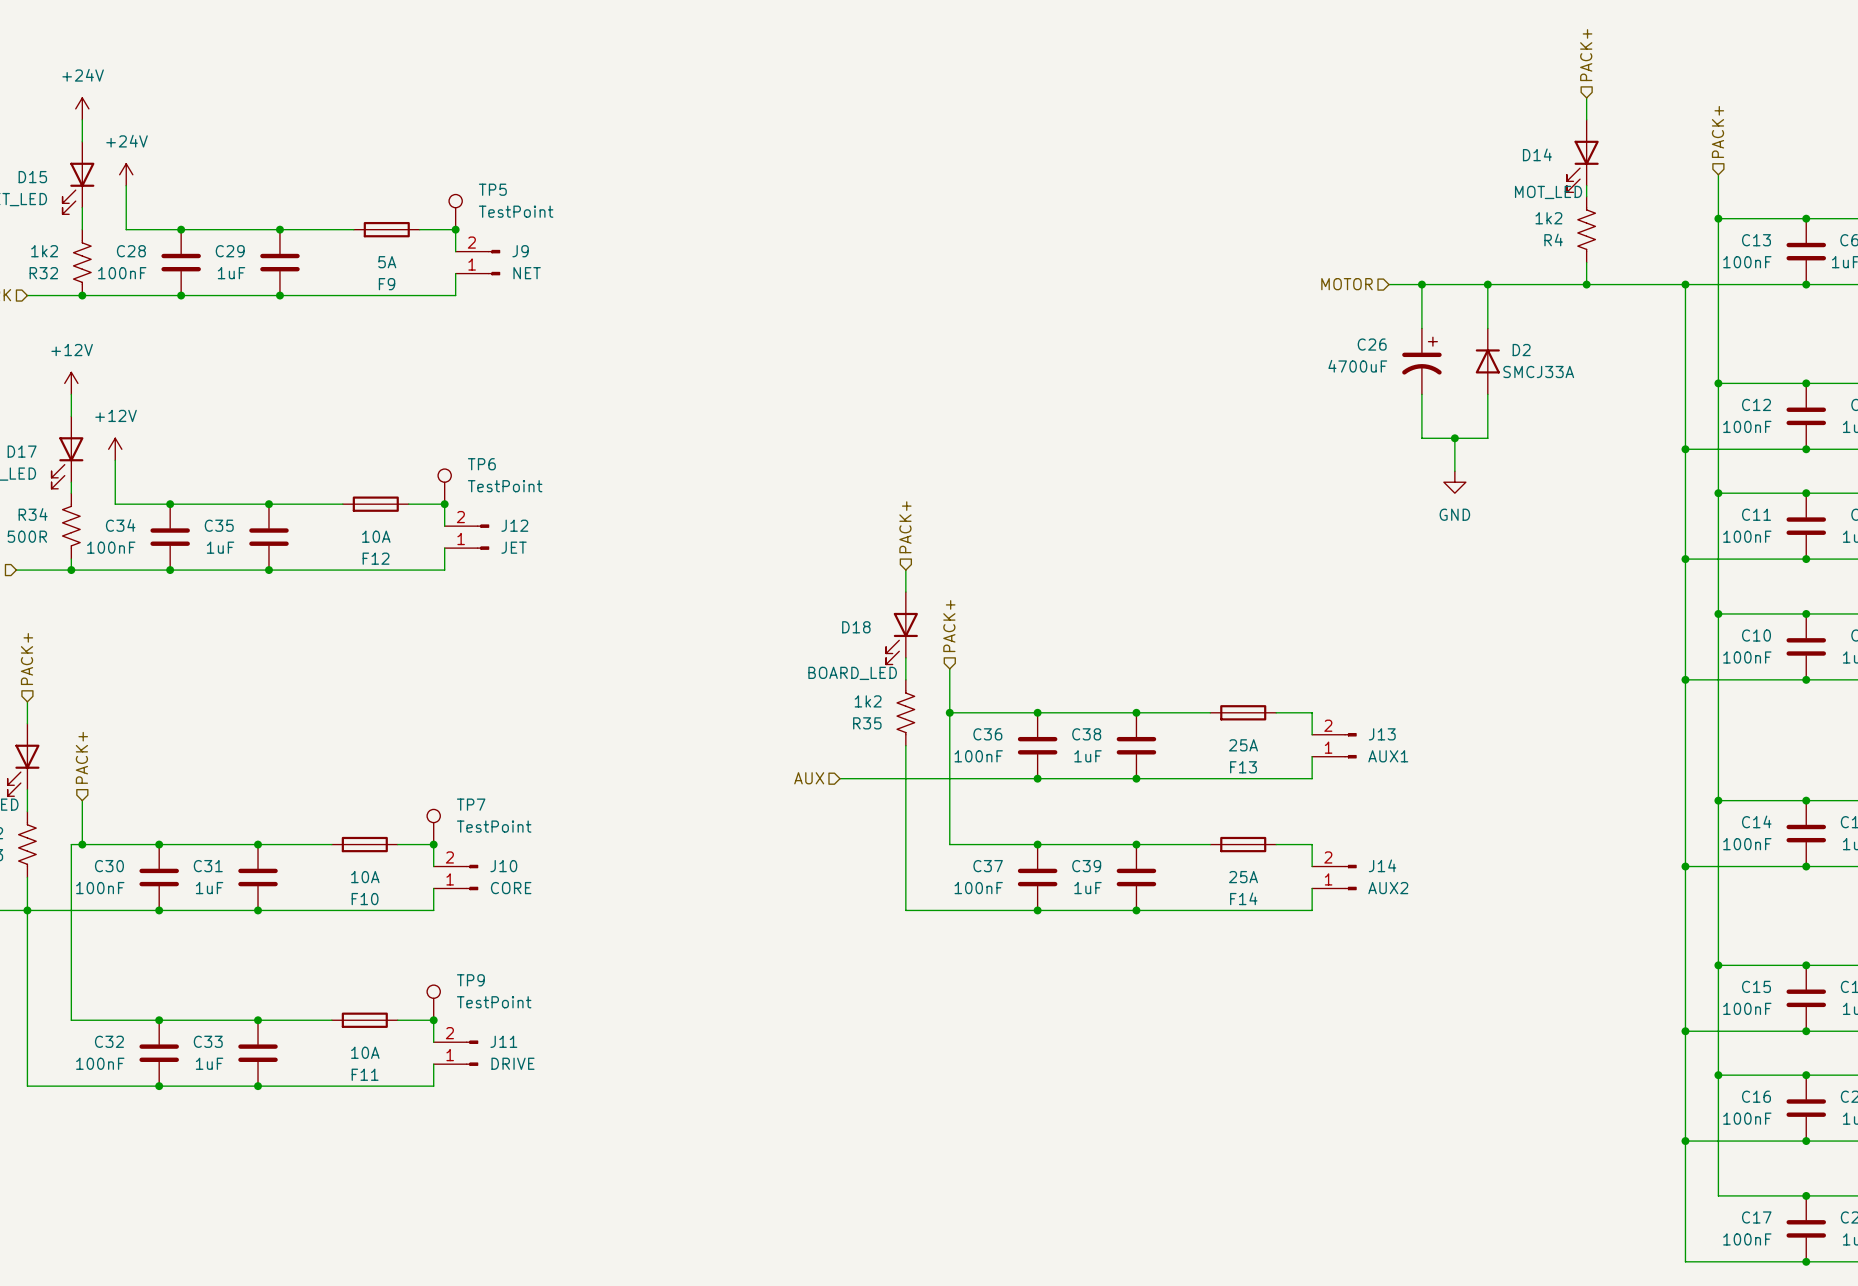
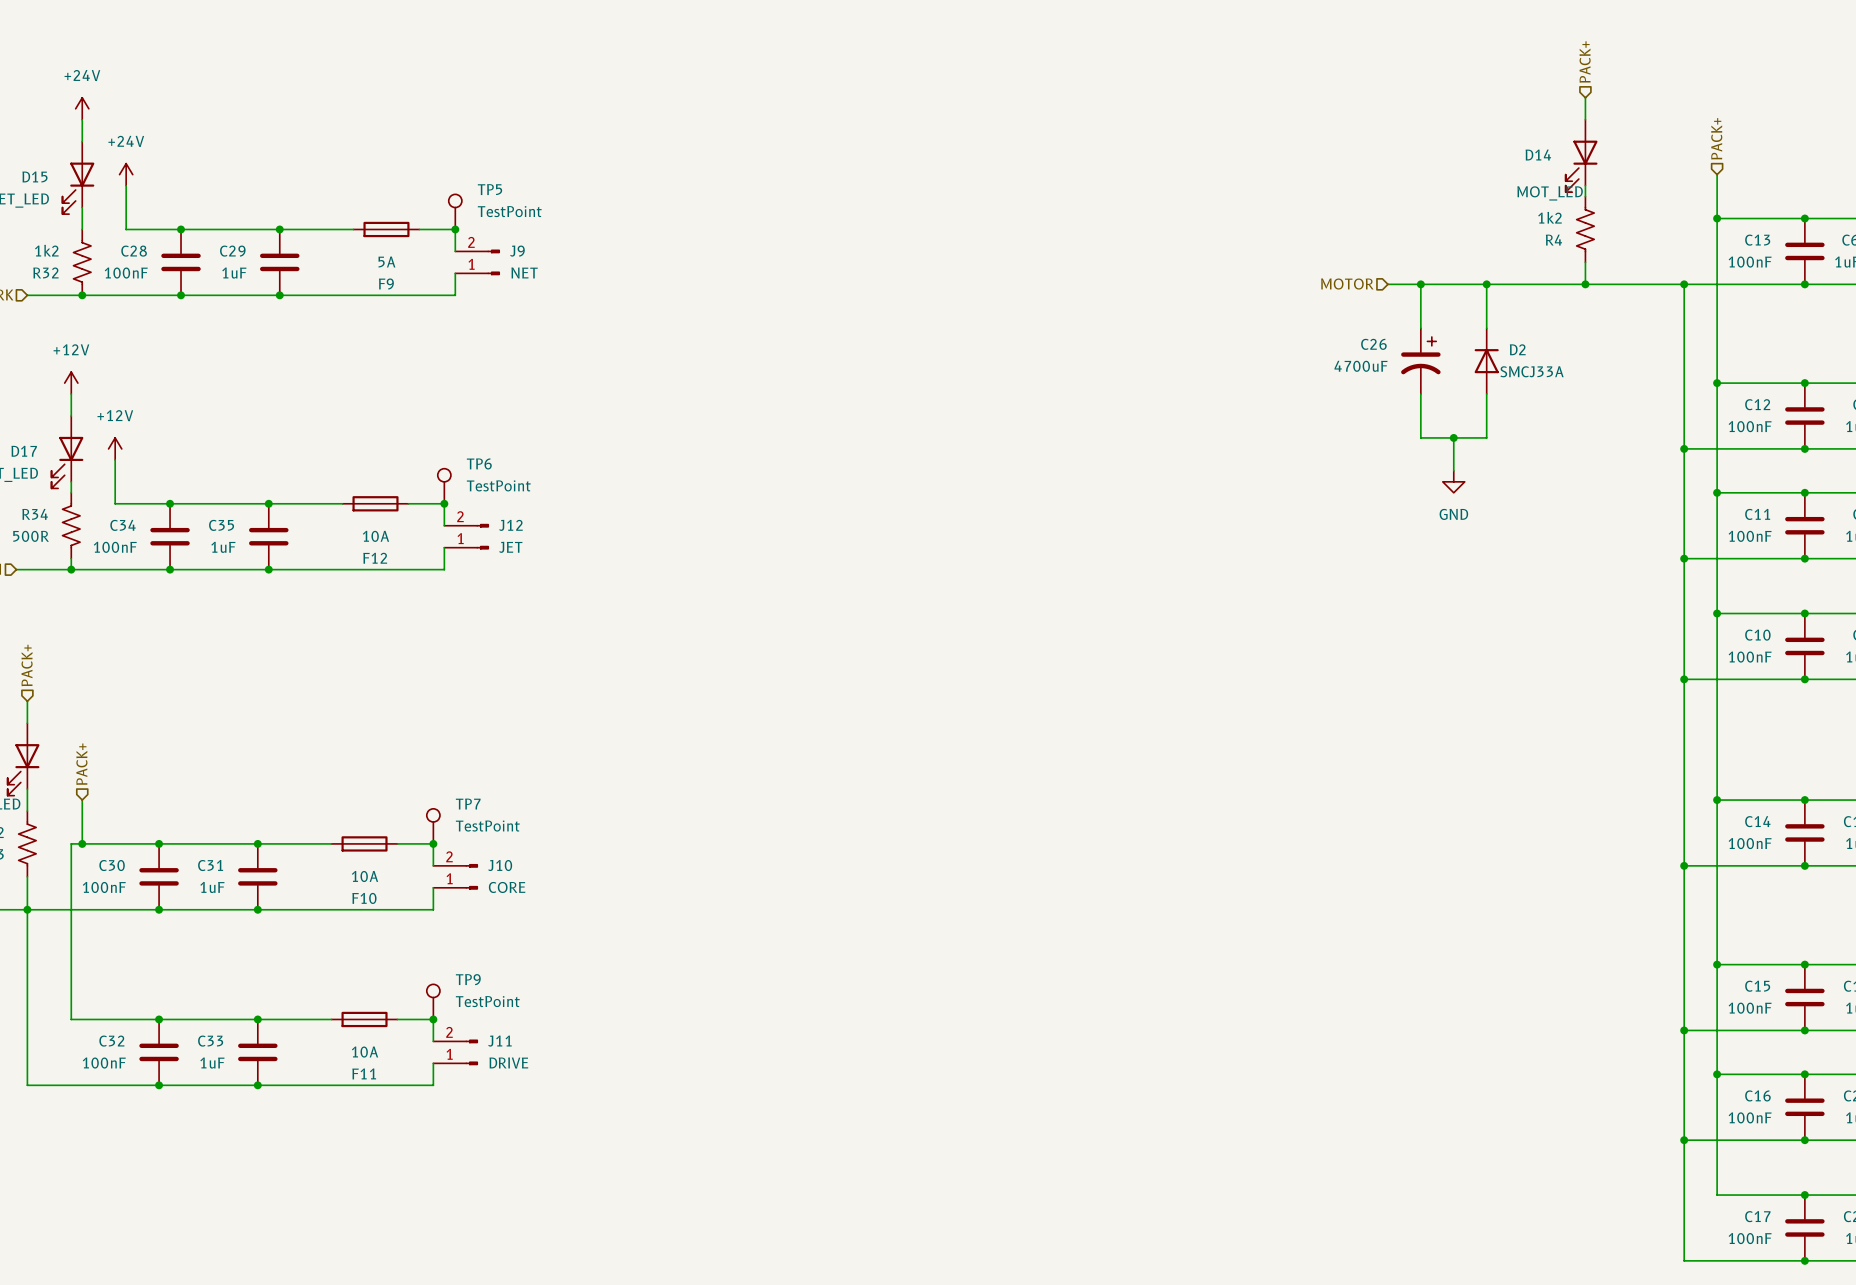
hierarchical label: PACK+ (905, 527) -> none
wire: (905, 570) (905, 592) -> none
hierarchical label: PACK+ (949, 626) -> none
D18: BOARD_LED (902, 628) -> none
wire: (905, 657) (905, 679) -> none
wire: (949, 668) (949, 844) (1210, 844) -> none
R35: 1k2 (905, 712) -> none
wire: (949, 712) (1210, 712) -> none
junction: (949, 712) -> none
junction: (1037, 712) -> none
junction: (1136, 712) -> none
F13: 25A (1243, 712) -> none
wire: (1276, 712) (1312, 712) (1312, 734) -> none
wire: (905, 745) (905, 910) (1312, 910) (1312, 888) -> none
C36: 100nF (1037, 745) -> none
C38: 1uF (1136, 745) -> none
J13: AUX1 (1334, 745) -> none
wire: (1312, 756) (1312, 778) (839, 778) -> none
hierarchical label: AUX (809, 778) -> none
junction: (1037, 778) -> none
junction: (1136, 778) -> none
junction: (1037, 844) -> none
junction: (1136, 844) -> none
F14: 25A (1243, 844) -> none
wire: (1276, 844) (1312, 844) (1312, 866) -> none
C37: 100nF (1037, 877) -> none
C39: 1uF (1136, 877) -> none
J14: AUX2 (1334, 877) -> none
junction: (1037, 910) -> none
junction: (1136, 910) -> none

